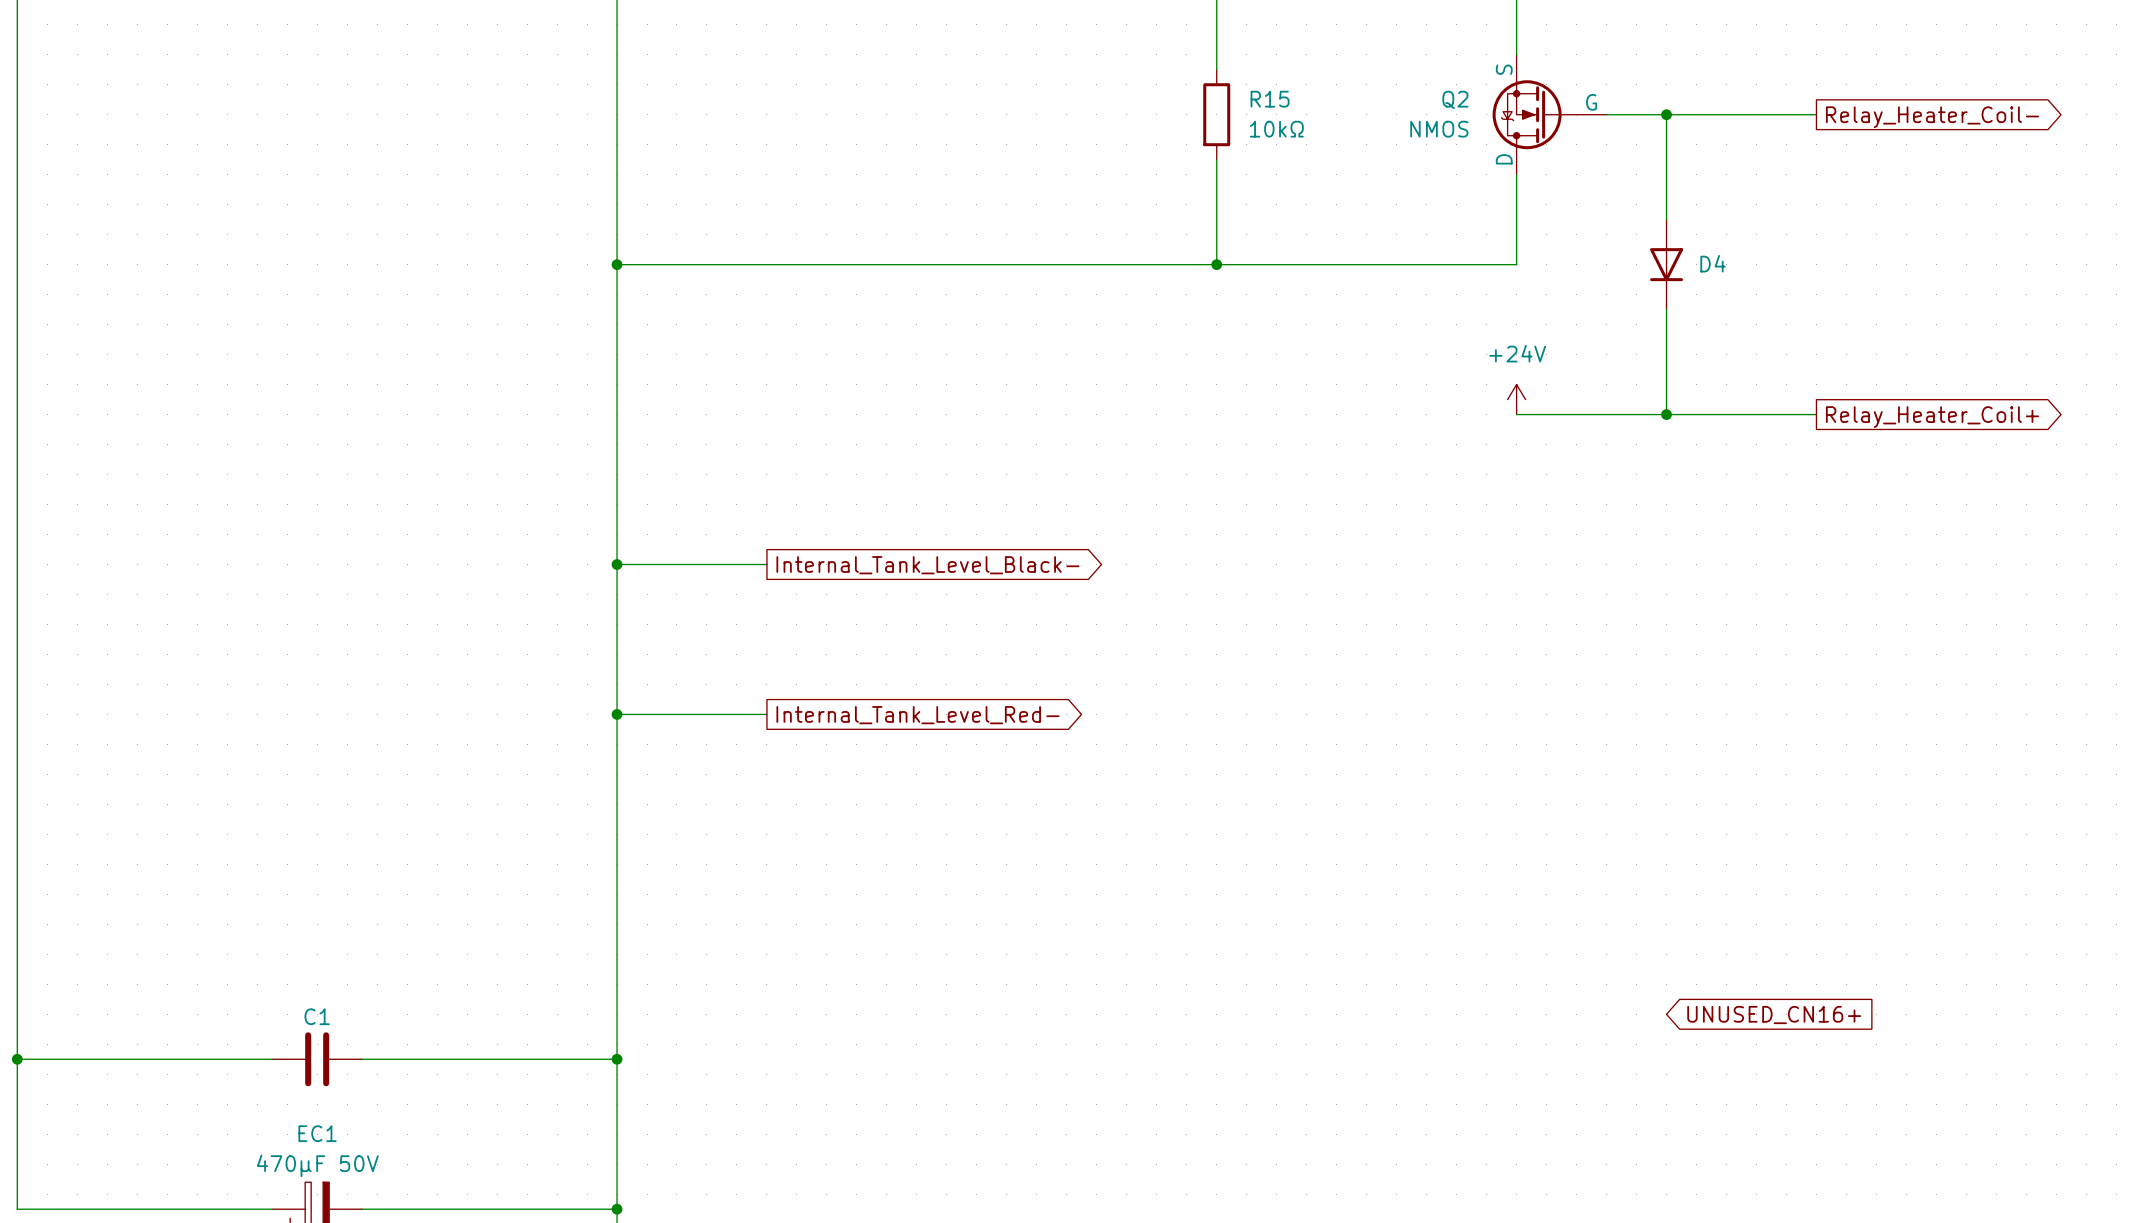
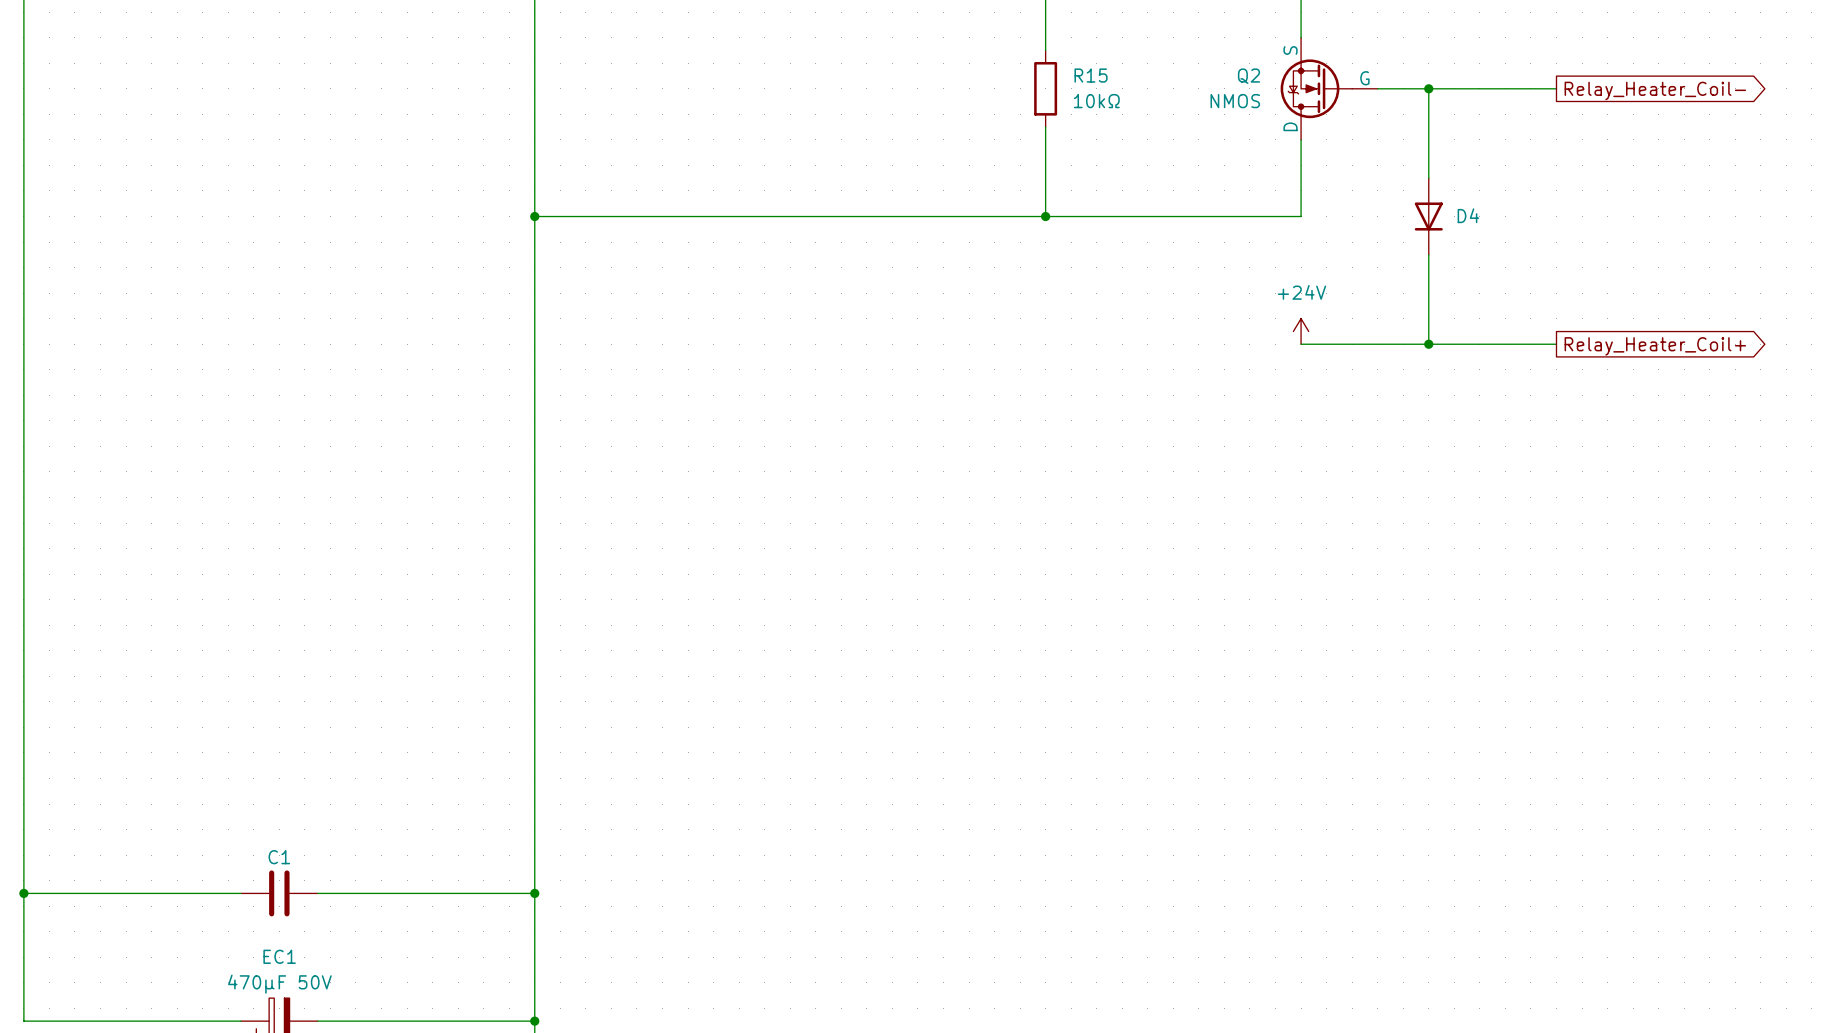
wire: (617, 564) (766, 564) -> none
junction: (617, 564) -> none
global label: Internal_Tank_Level_Black- (927, 565) -> none
wire: (617, 714) (766, 714) -> none
junction: (617, 714) -> none
global label: Internal_Tank_Level_Red- (917, 715) -> none
global label: UNUSED_CN16+ (1774, 1015) -> none

